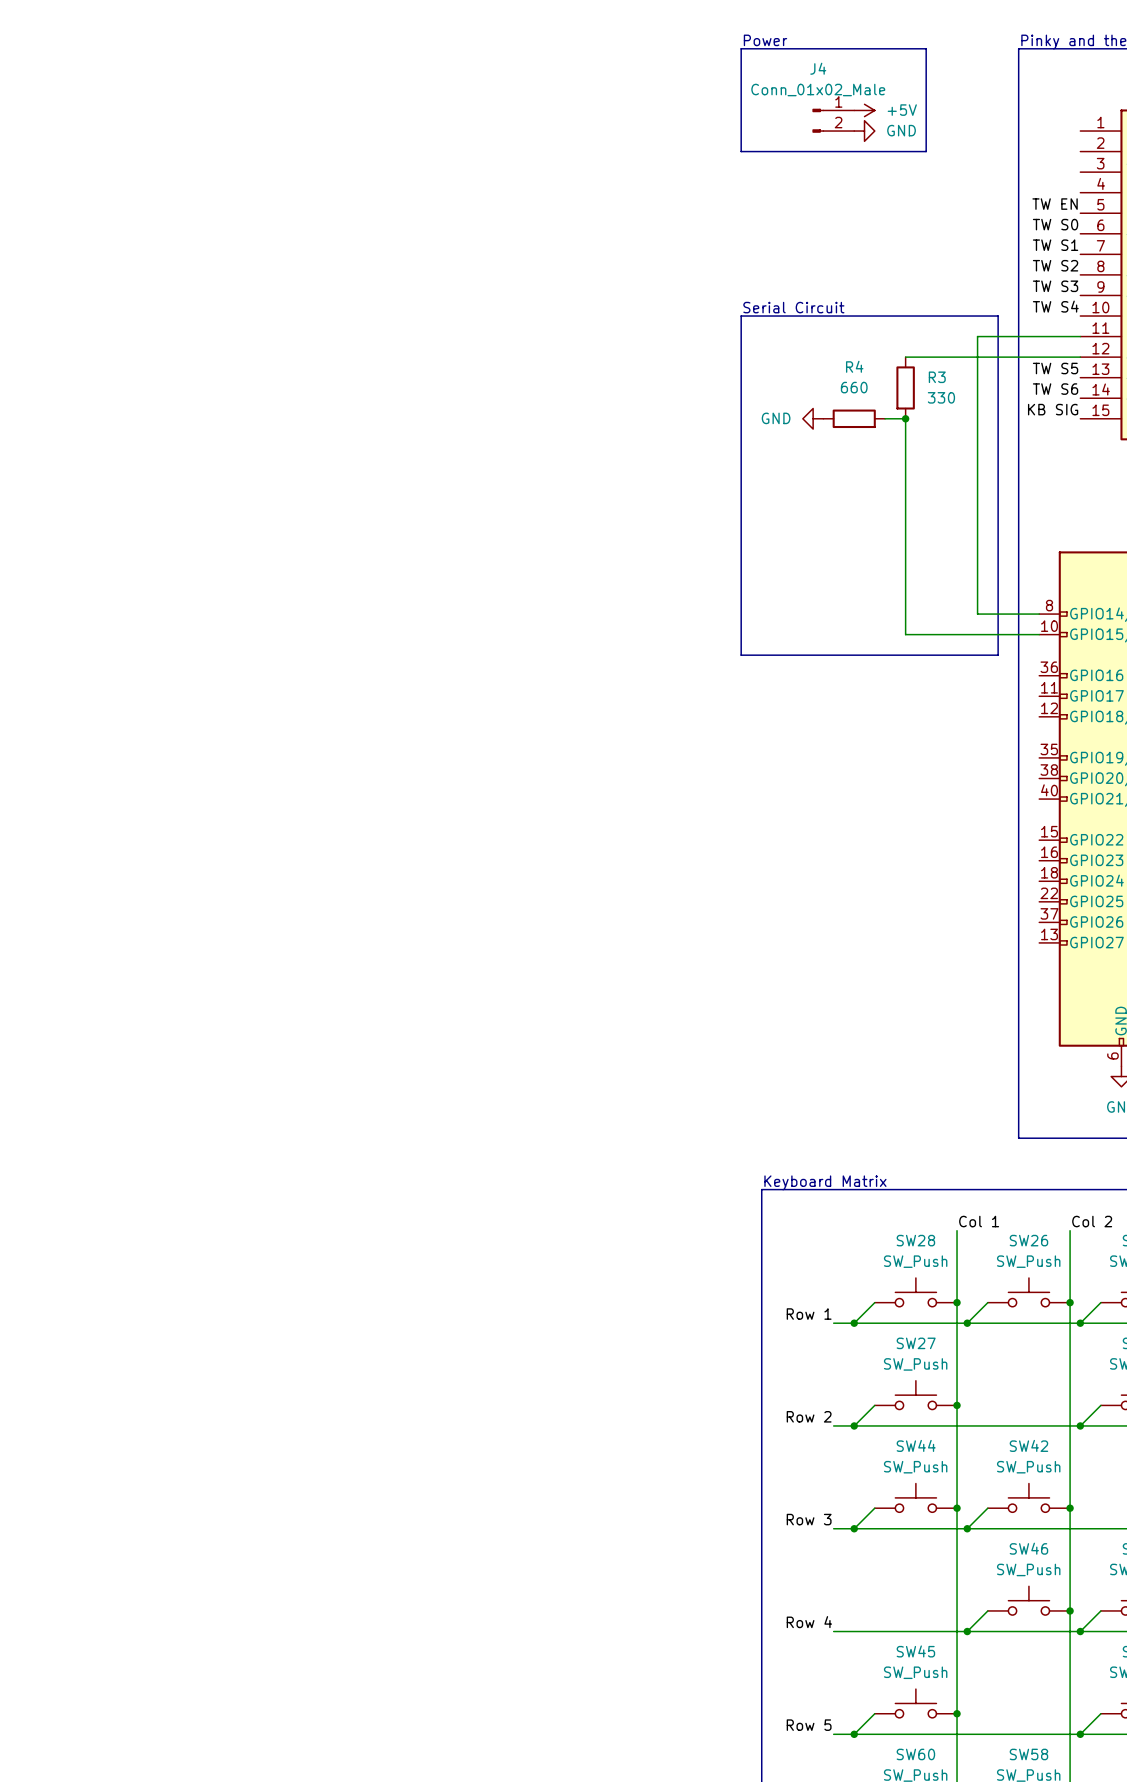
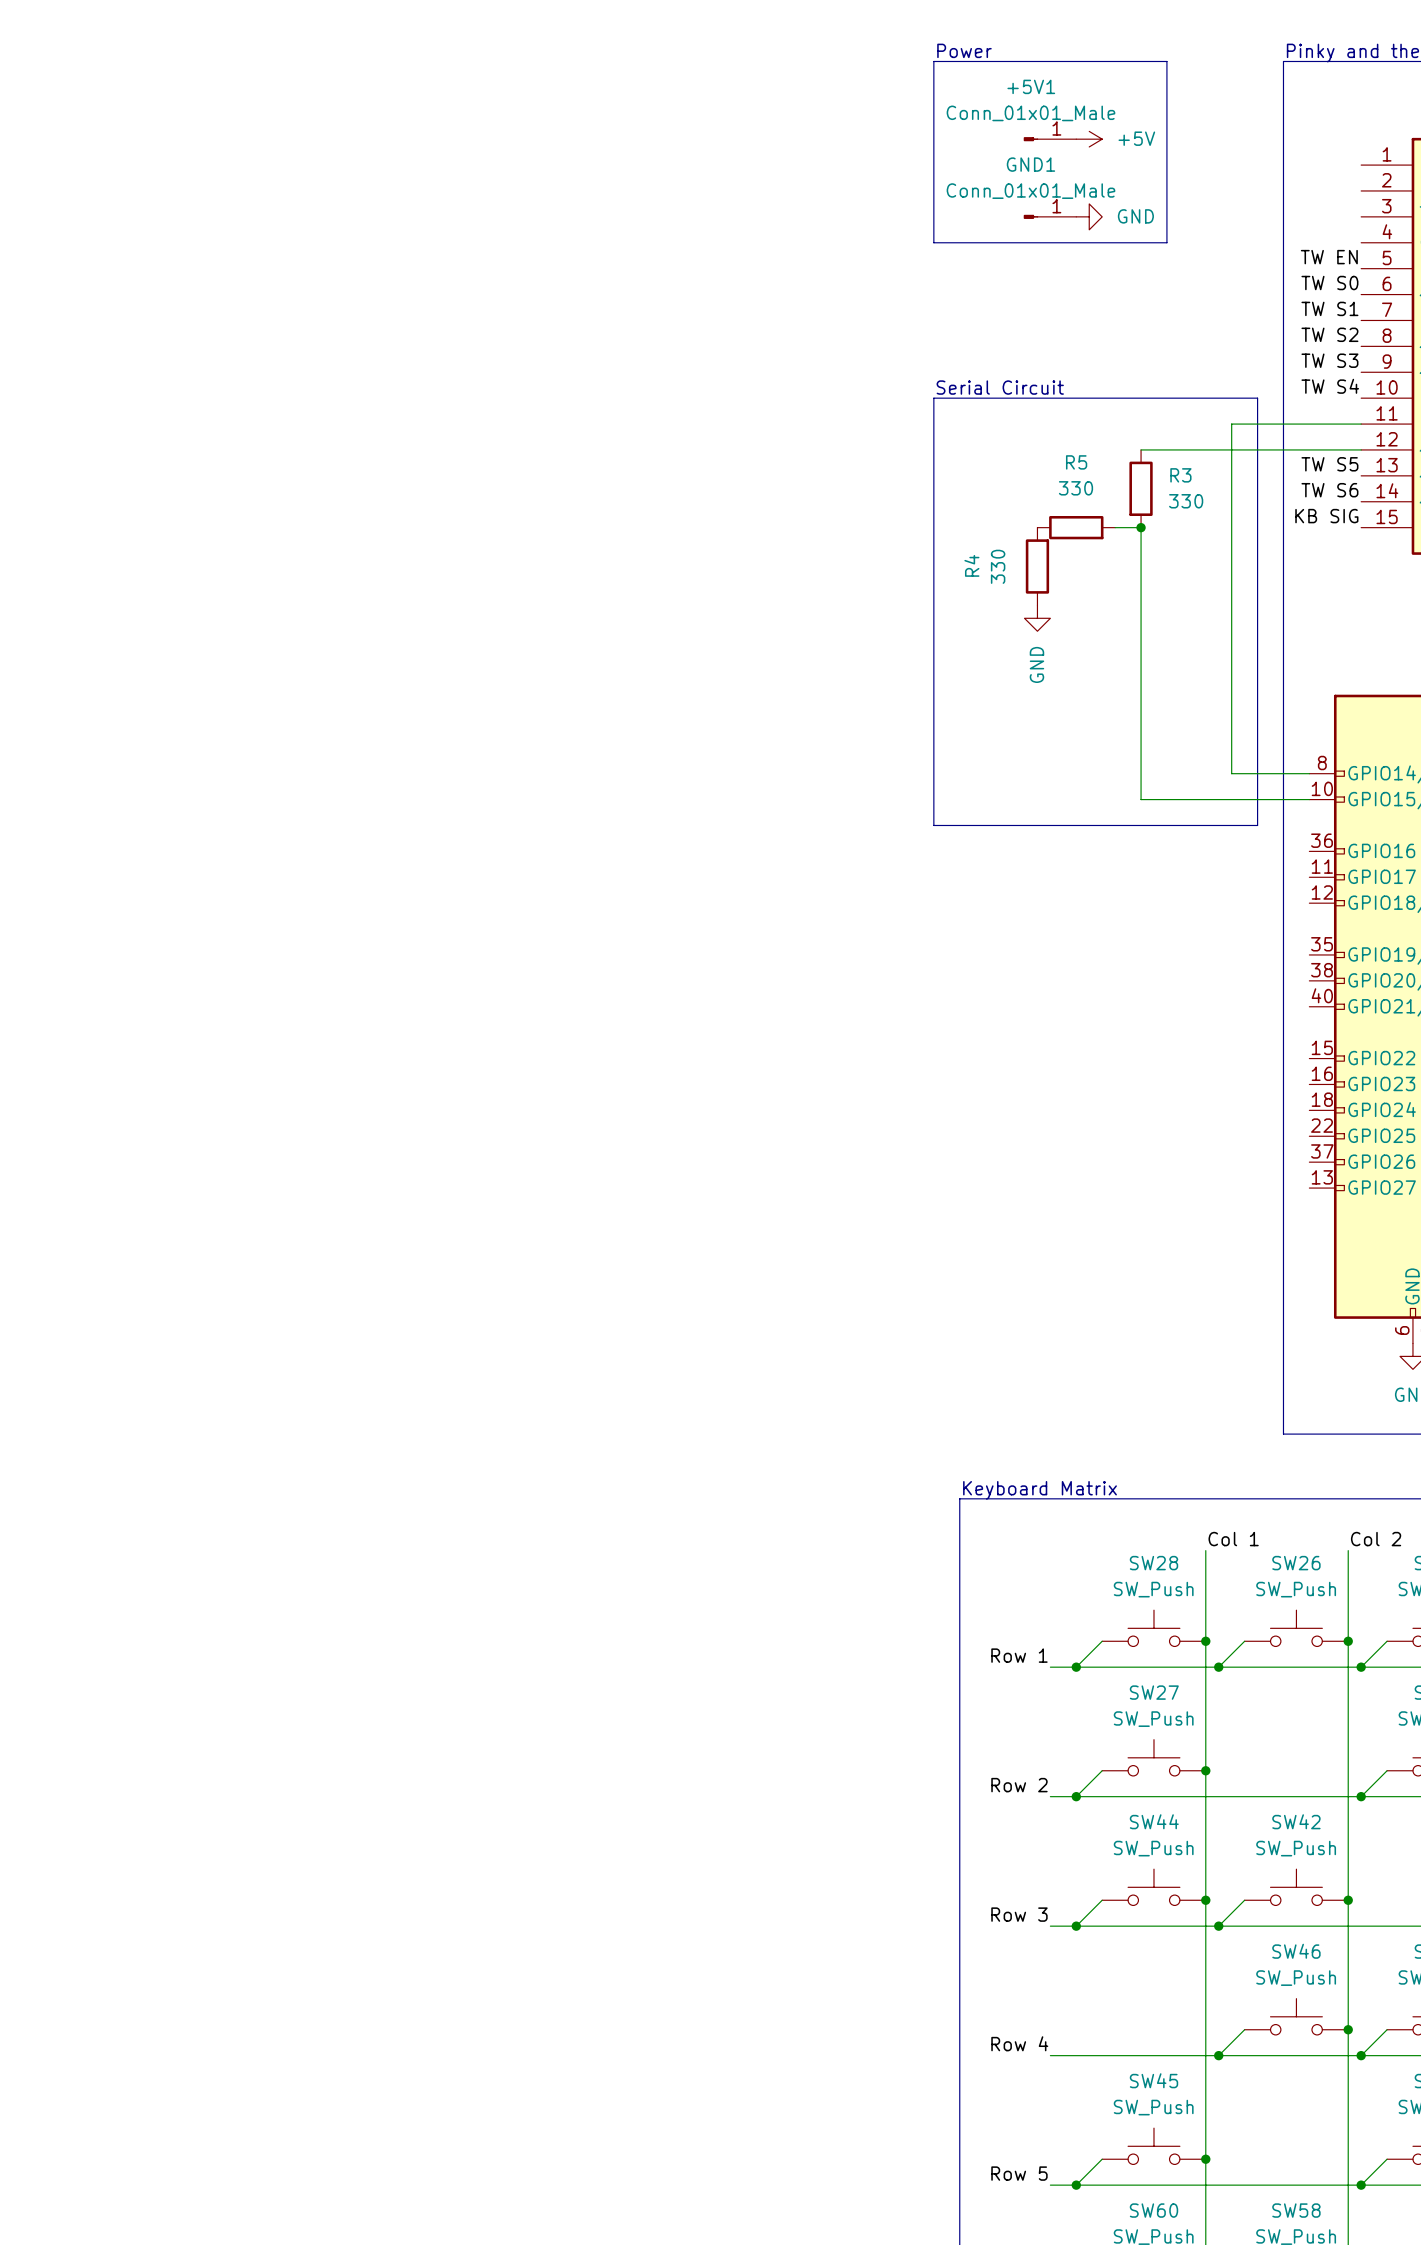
+5V1: none -> Conn_01x01_Male (1050, 139)
J4: Conn_01x02_Male (833, 120) -> none
power symbol position: GND (864, 131) -> GND (1089, 216)
line: (741, 151) (926, 151) -> (933, 190) (933, 242) (1166, 242) (1166, 190)
GND1: none -> Conn_01x01_Male (1050, 216)
R4 name: R4 (854, 366) -> R5 (1076, 462)
R4 value: 660 (854, 387) -> 330 (1075, 488)
power symbol rotation: 0° (813, 418) -> 90° counterclockwise (1037, 618)
power symbol position: GND (813, 418) -> GND (1037, 618)
R4: none -> 330 (1037, 566)

